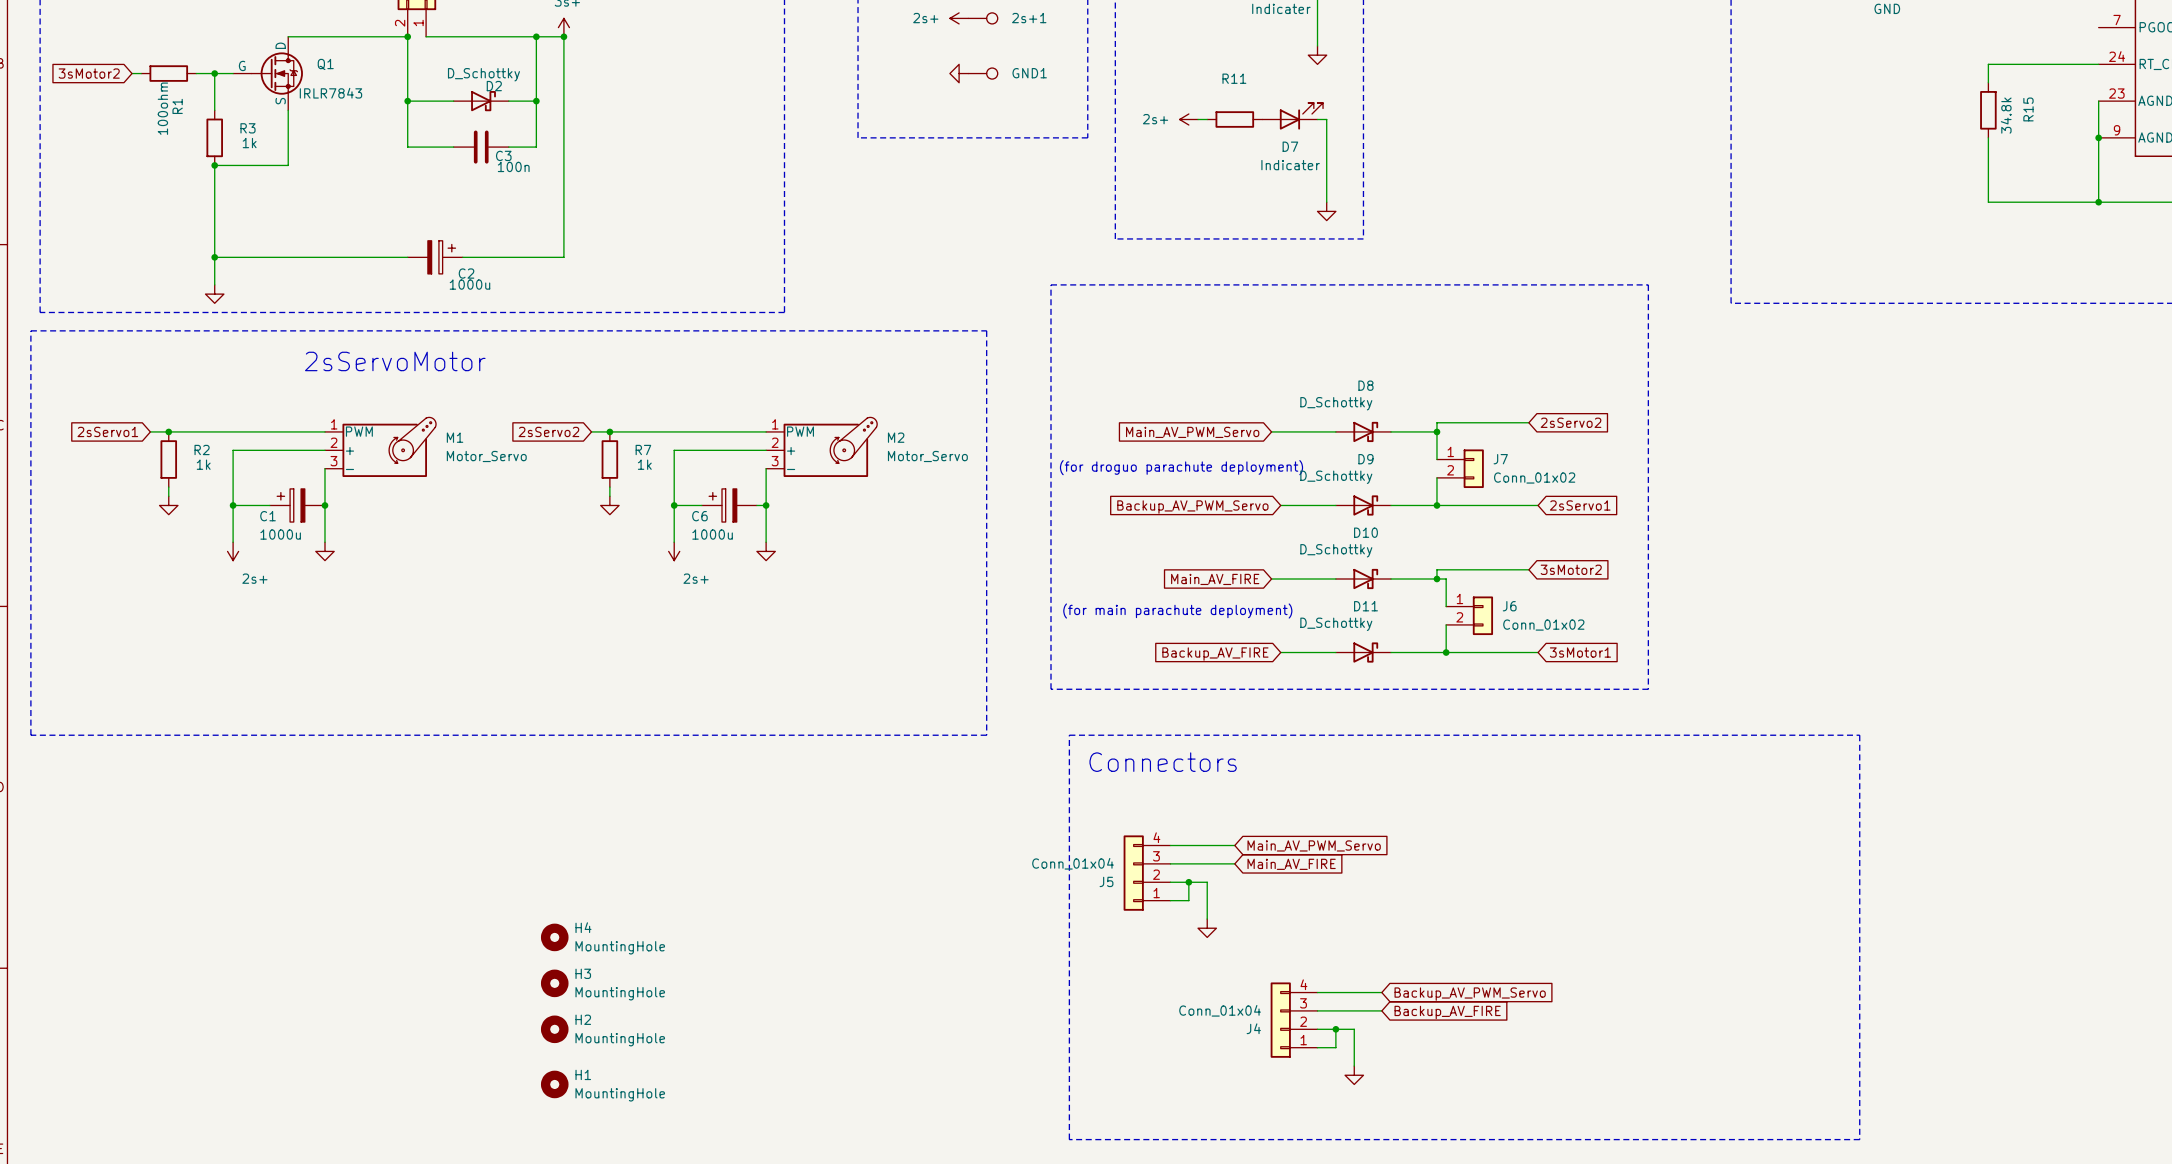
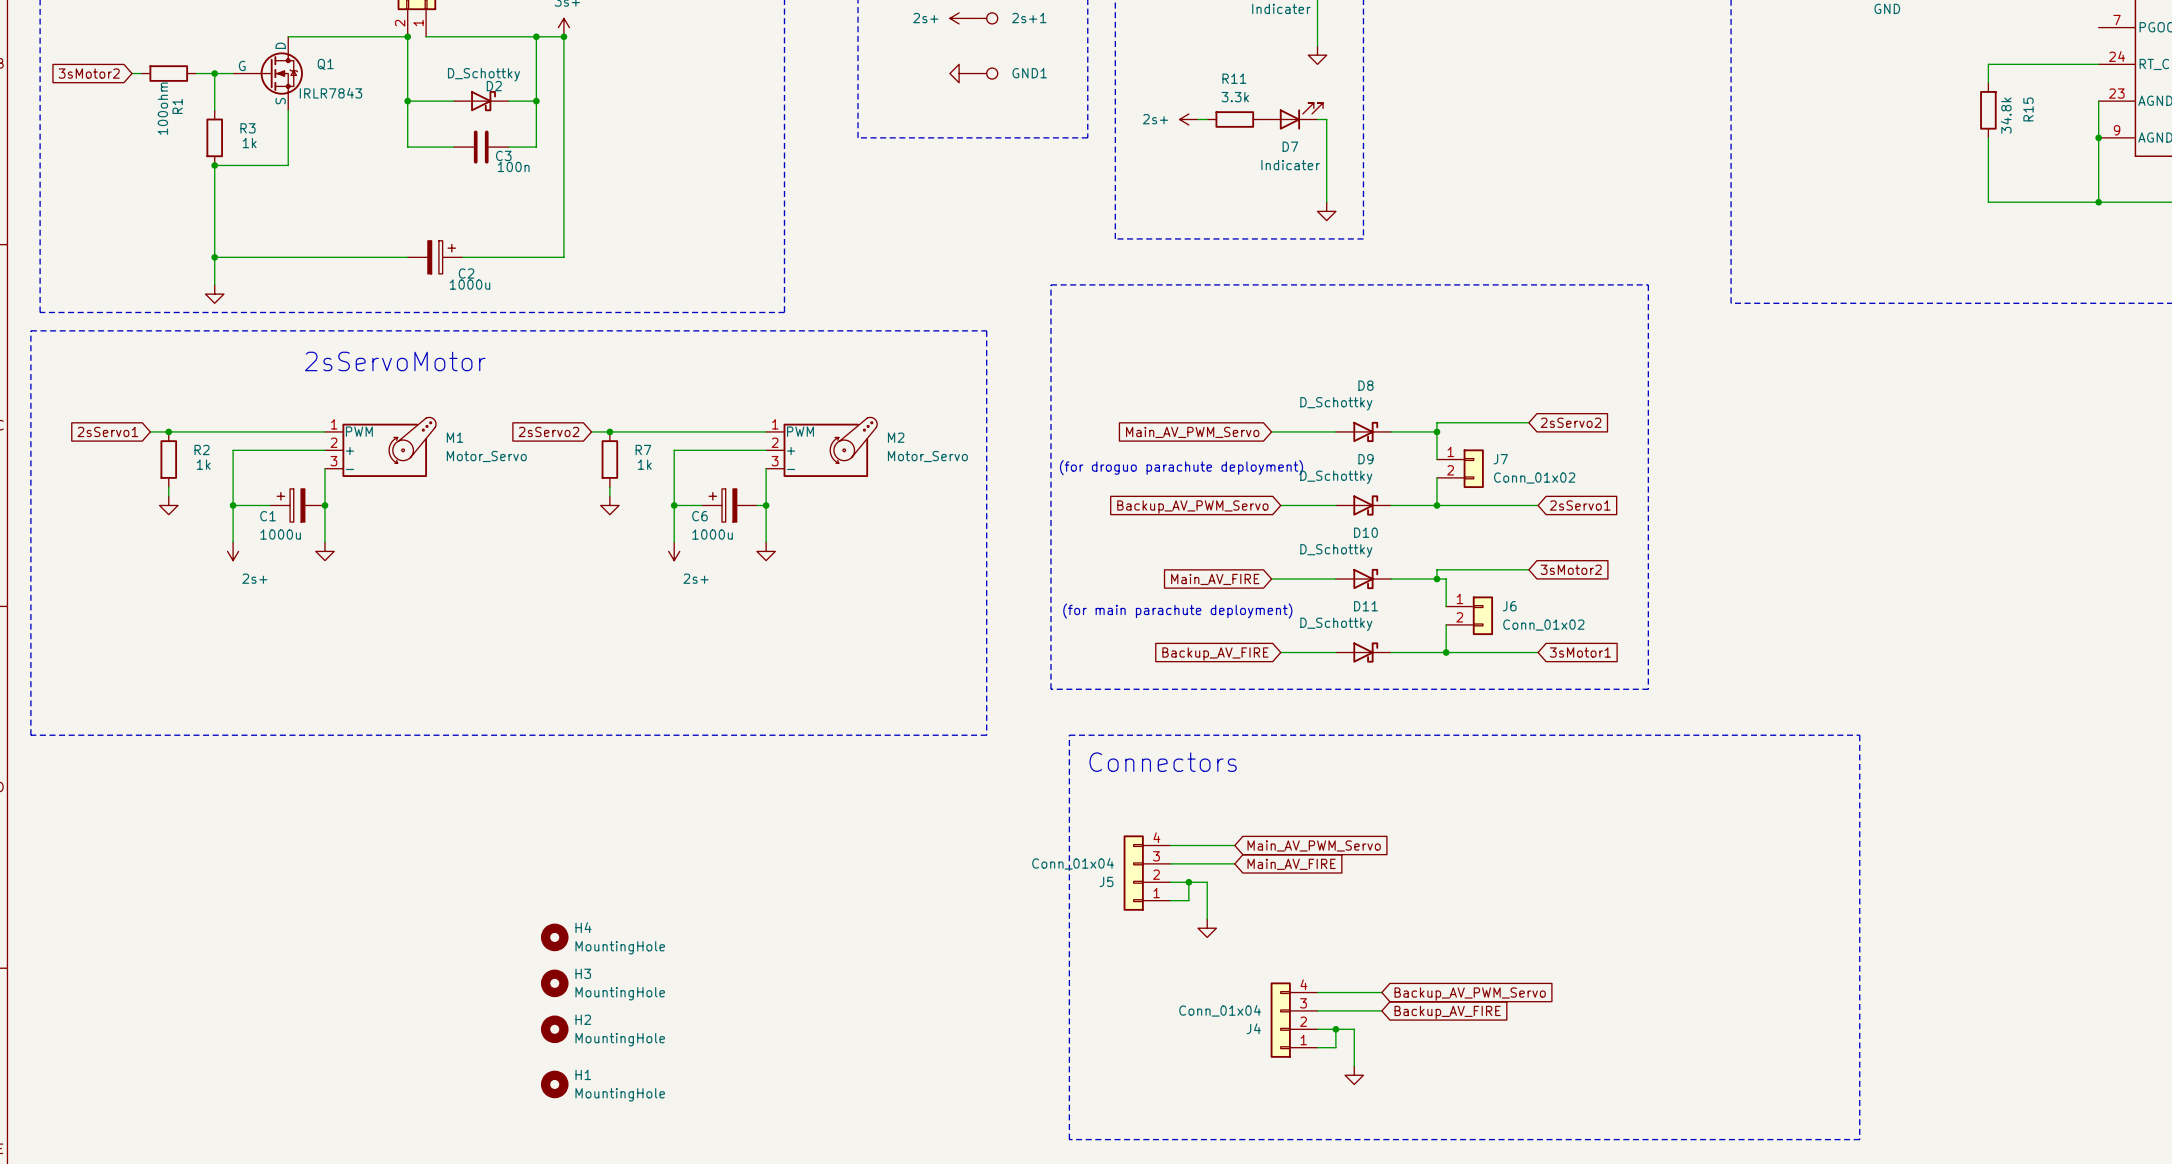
R11 value: none -> 3.3k (1235, 97)

